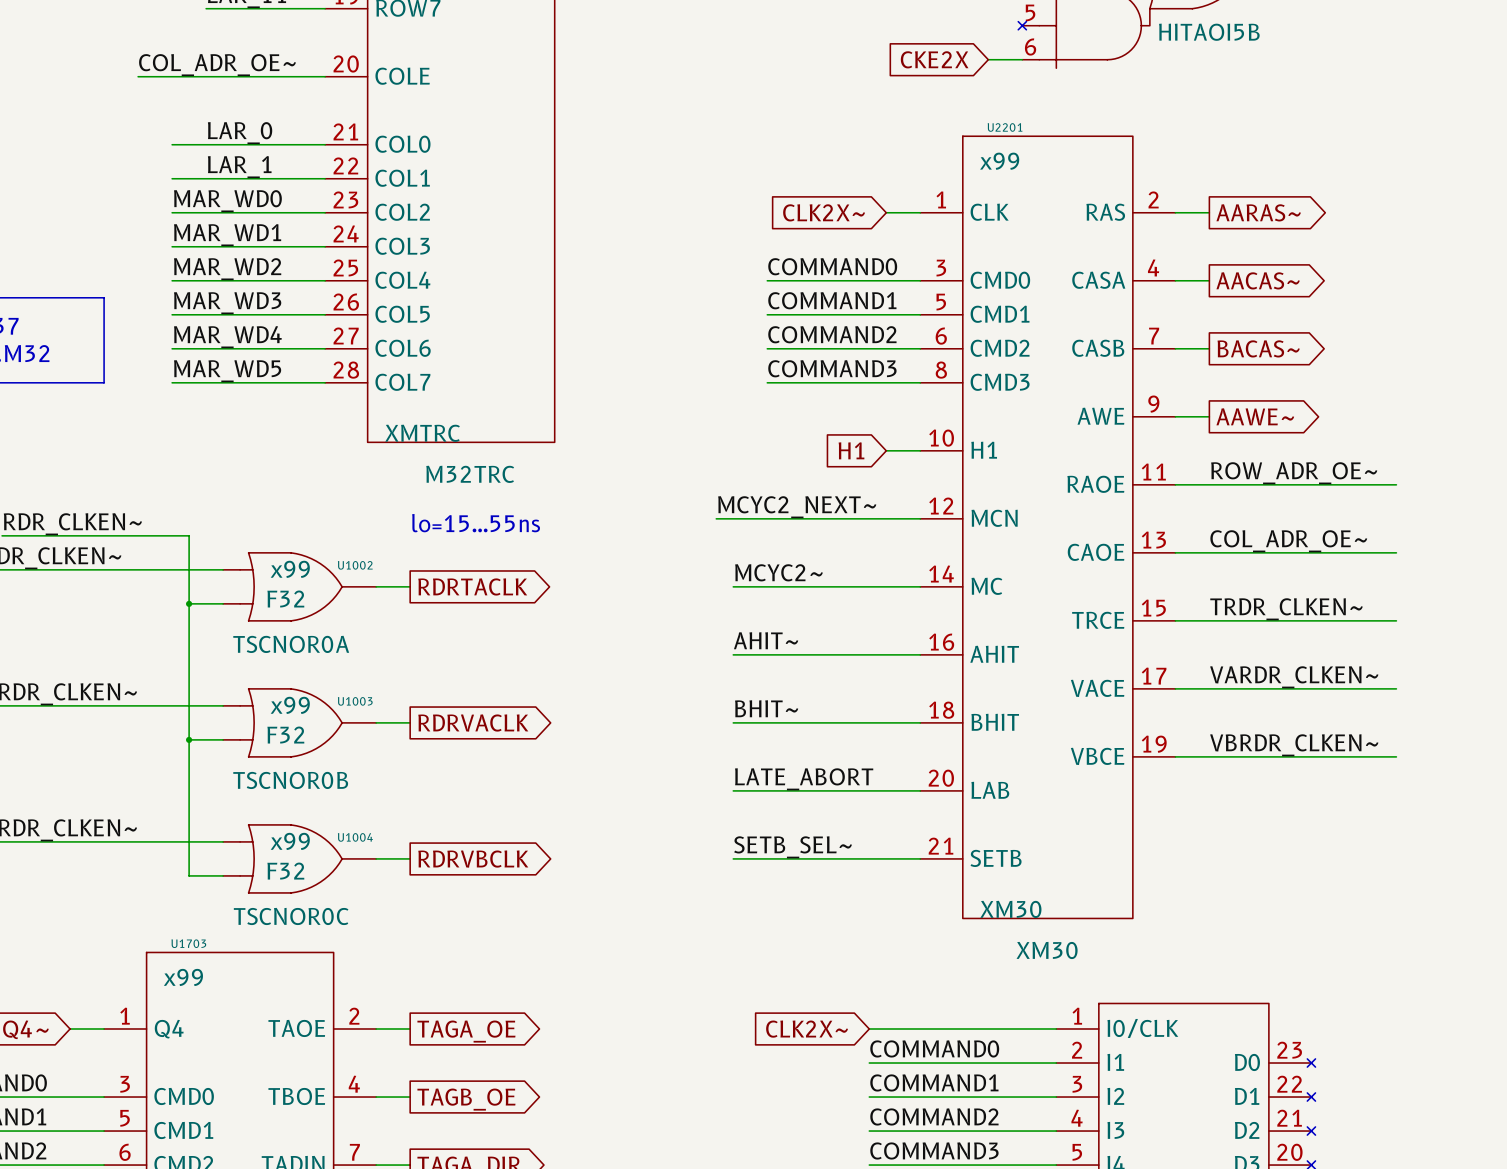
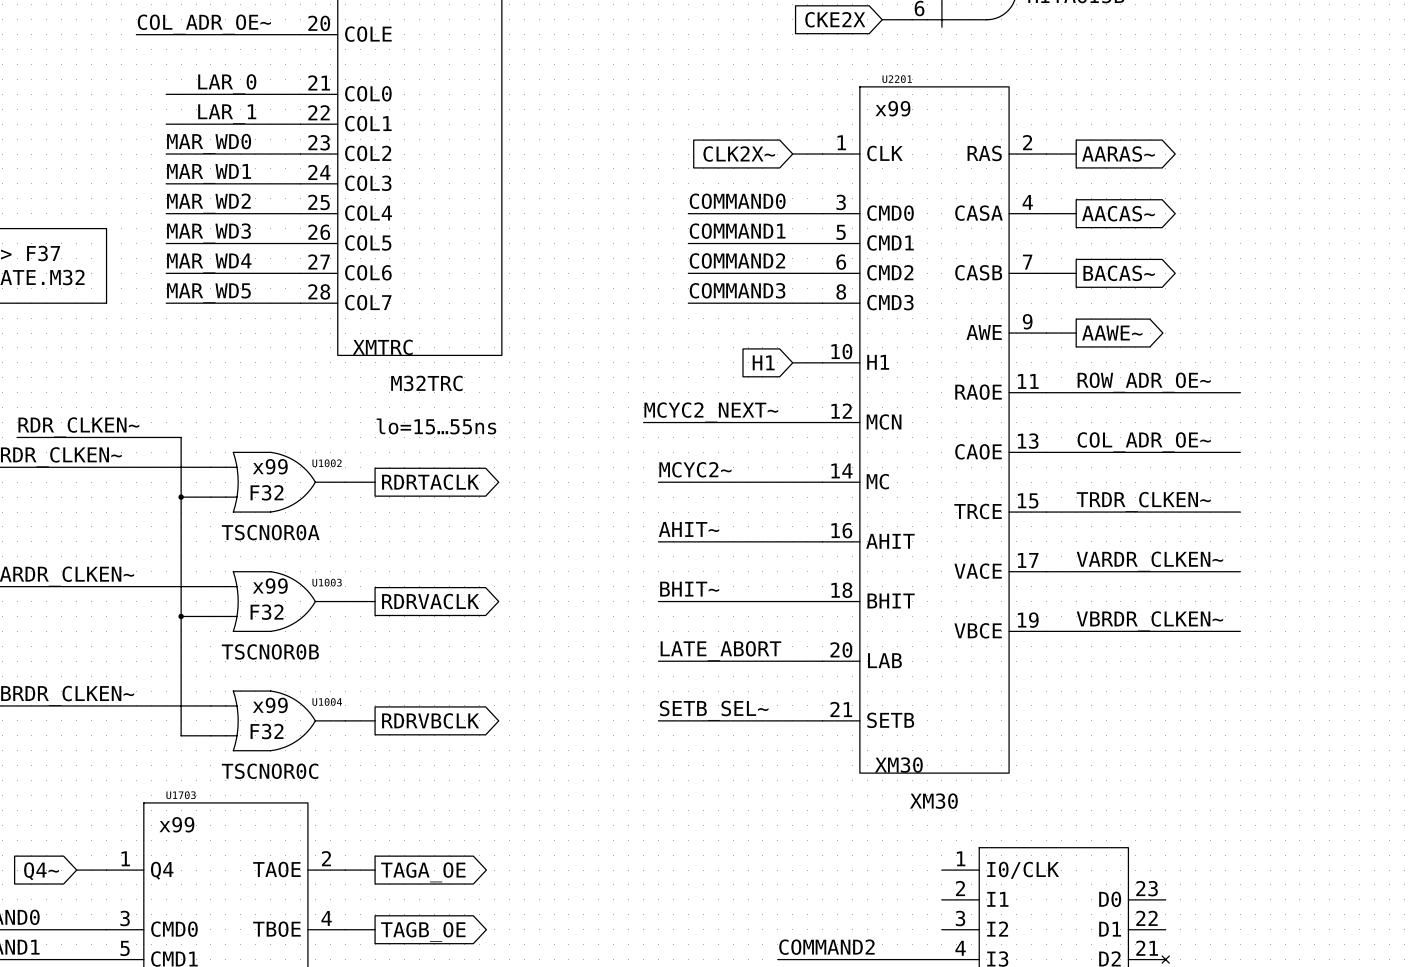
wire: (869, 1028) (1056, 1028) -> none
global label: CLK2X~ (807, 1029) -> none
label: COMMAND0 (934, 1048) -> none
wire: (869, 1063) (1056, 1063) -> none
no-connect mark: (1311, 1063) -> none
label: COMMAND1 (934, 1082) -> none
wire: (869, 1097) (1056, 1097) -> none
no-connect mark: (1311, 1097) -> none

